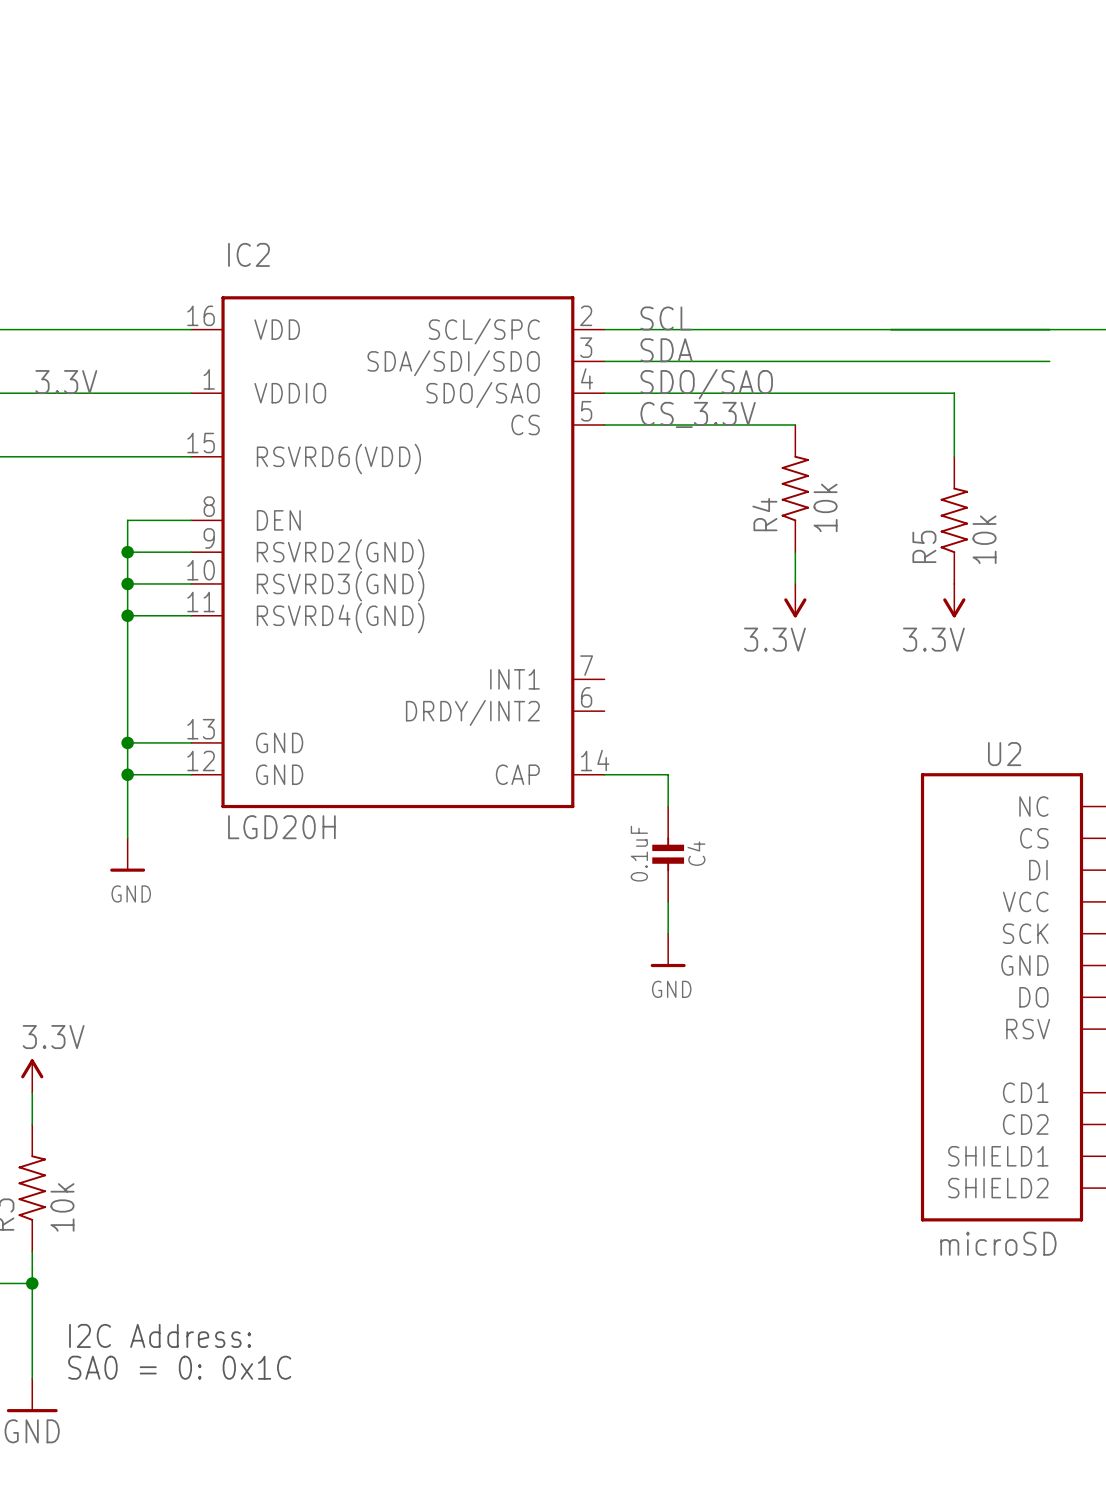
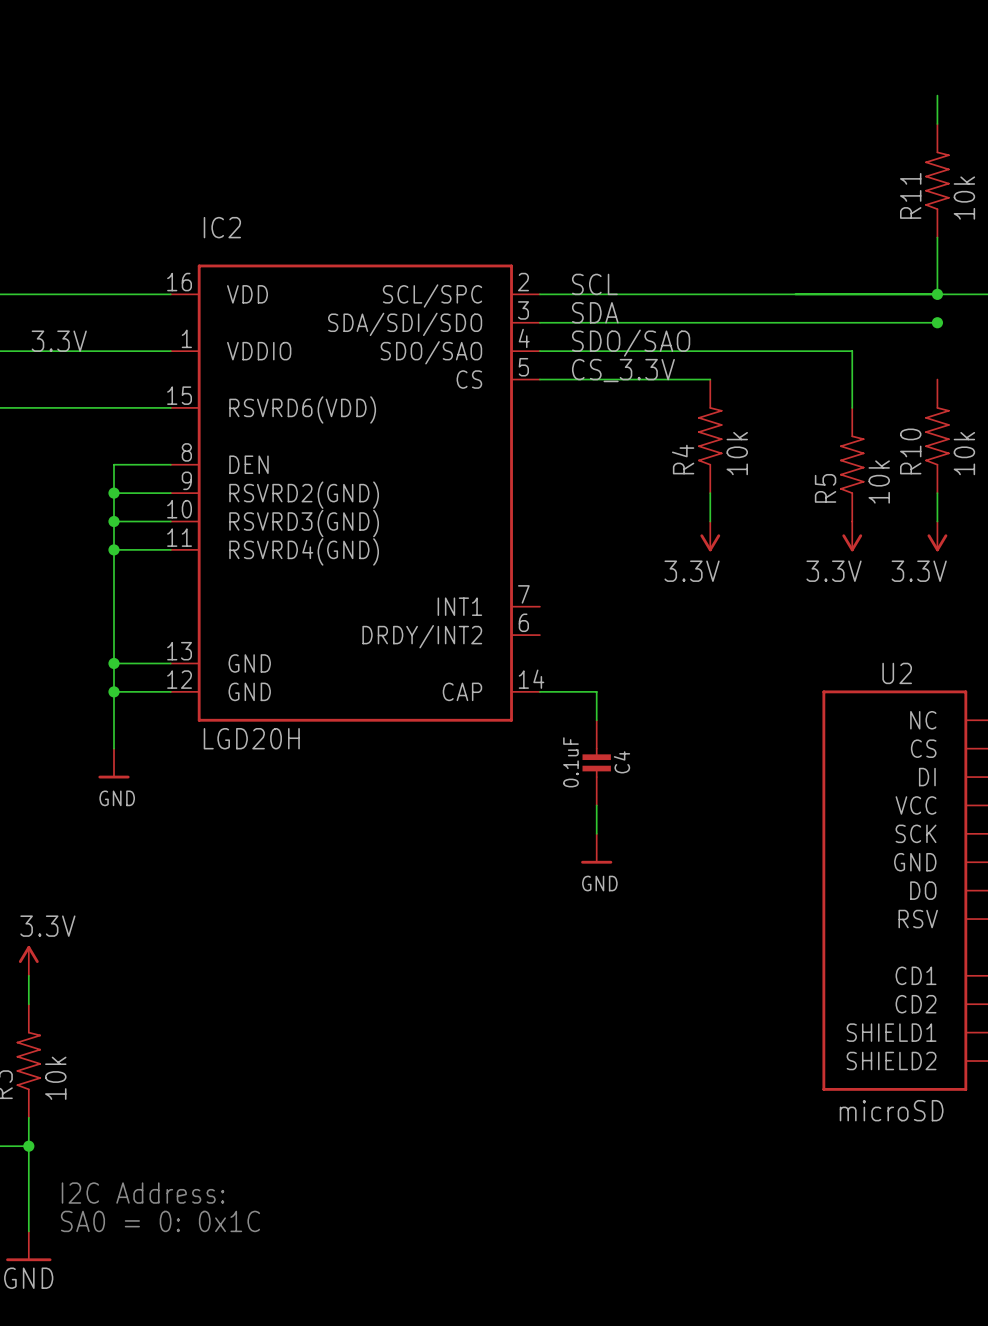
wire: none -> (937, 95) (937, 123)
R11: none -> 10k (937, 180)
wire: none -> (937, 237) (937, 294)
junction: none -> (937, 294)
junction: none -> (937, 322)
R10: none -> 10k (937, 436)
wire: none -> (937, 493) (937, 521)
power symbol: none -> 3.3V (937, 536)

